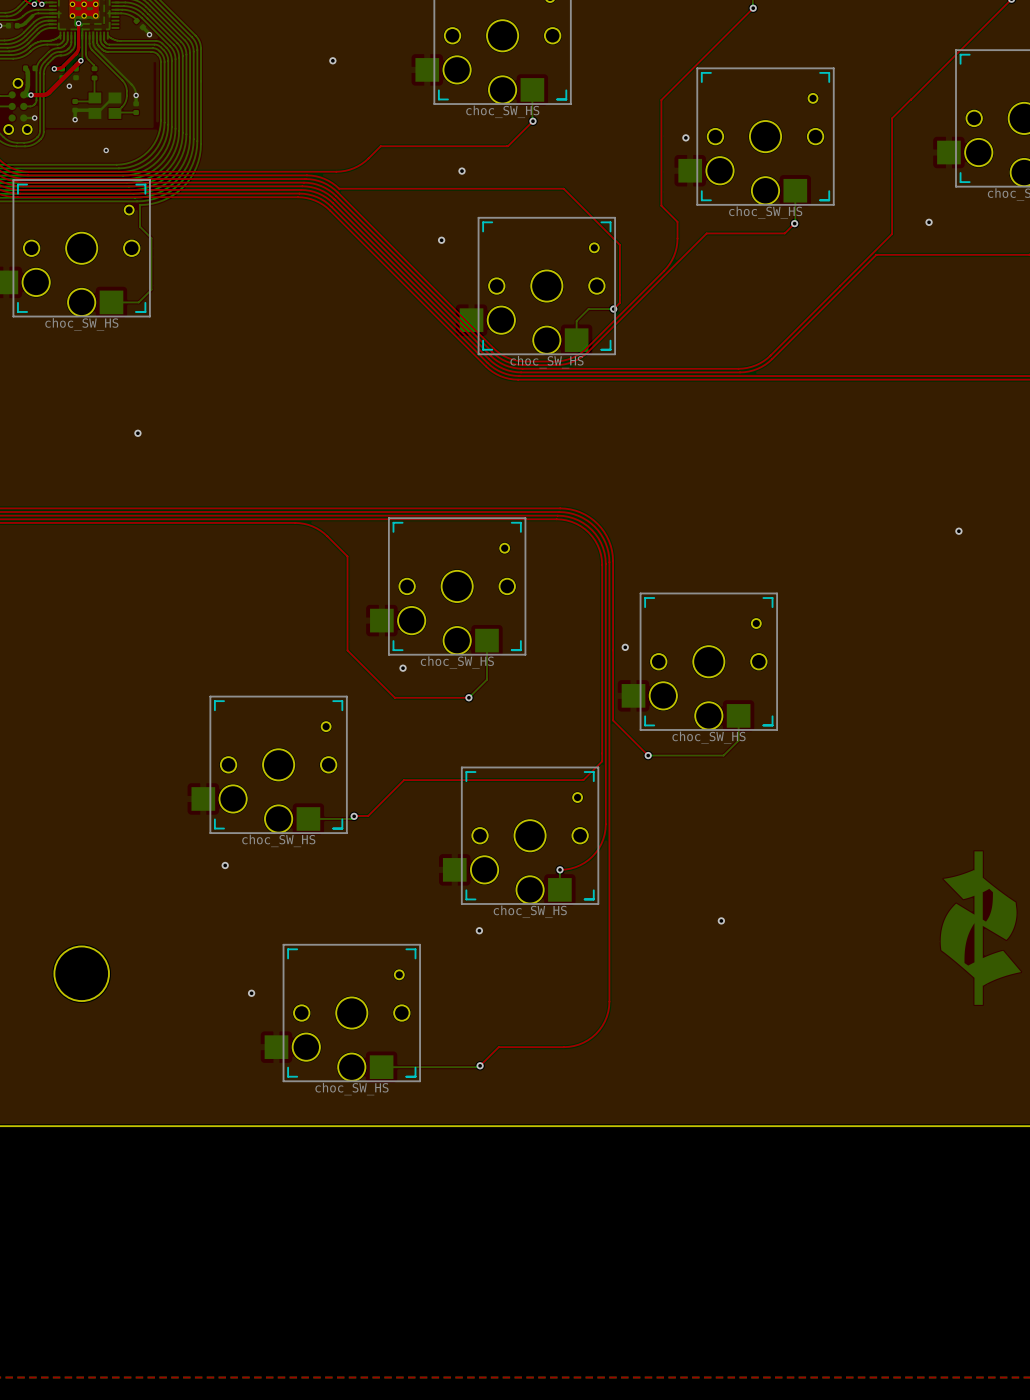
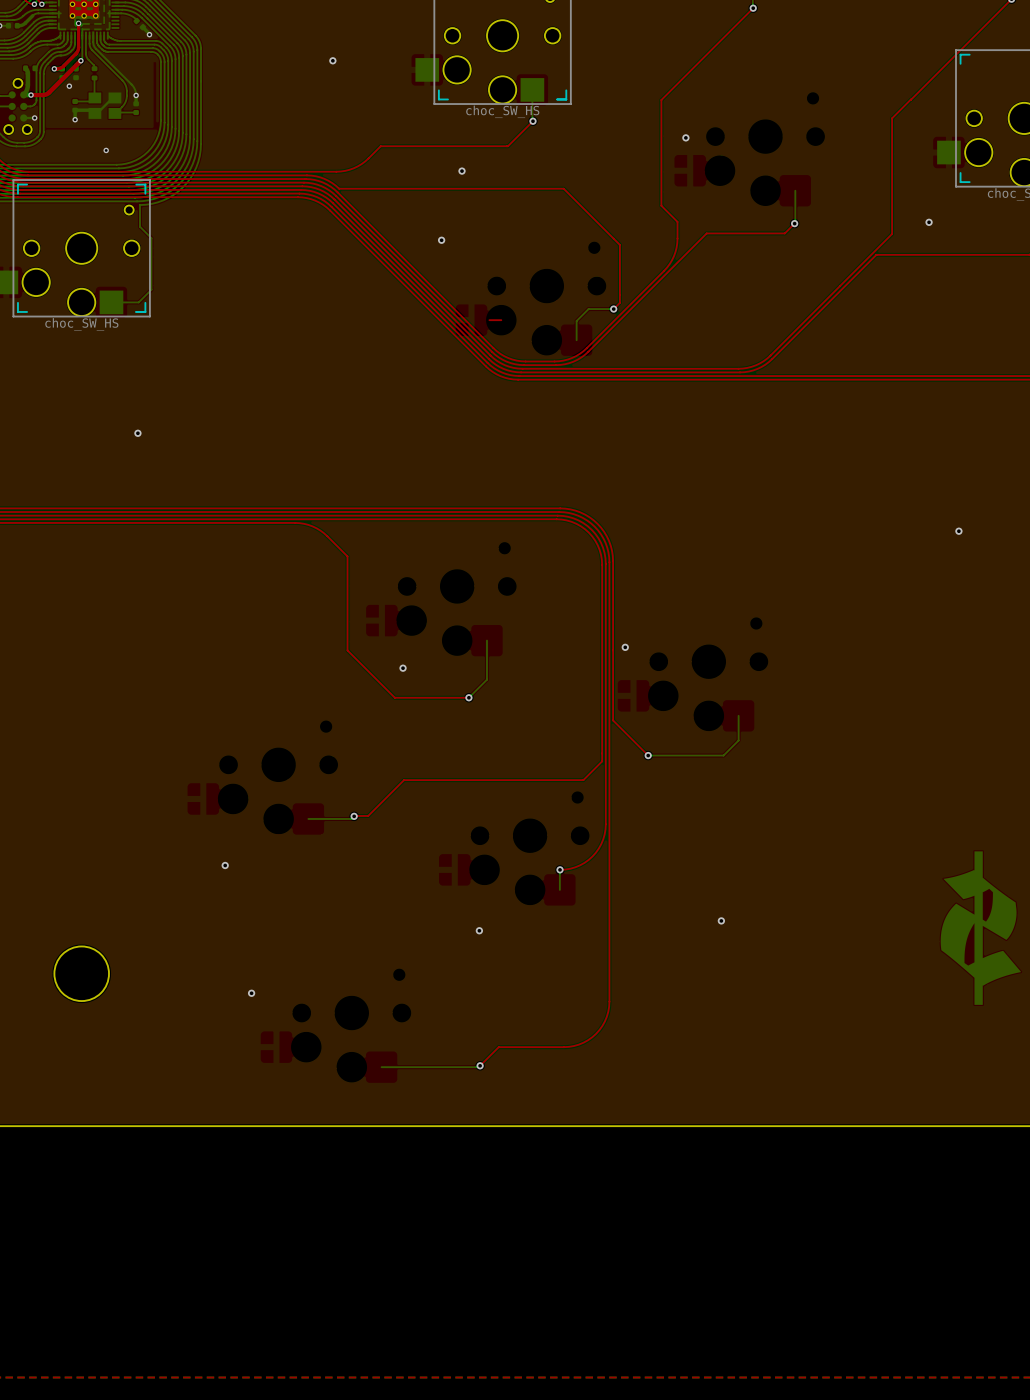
part: choc_SW_HS (756, 136) -> none
part: choc_SW_HS (537, 286) -> none
part: choc_SW_HS (448, 586) -> none
part: choc_SW_HS (699, 661) -> none
part: choc_SW_HS (269, 764) -> none
part: choc_SW_HS (520, 835) -> none
part: choc_SW_HS (342, 1013) -> none

